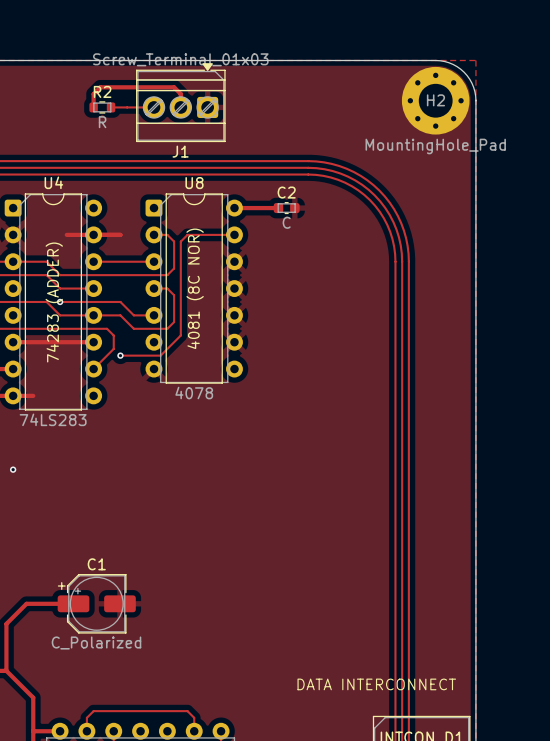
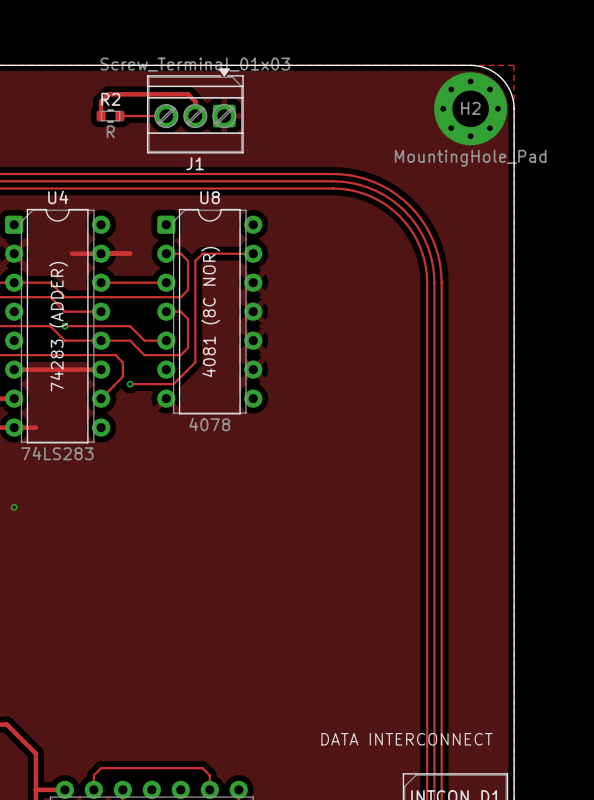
track: (234, 208) (278, 208) -> none
C2: C (286, 208) -> none
track: (73, 603) (26, 603) (6, 623) (6, 670) -> none
C1: C_Polarized (96, 603) -> none

